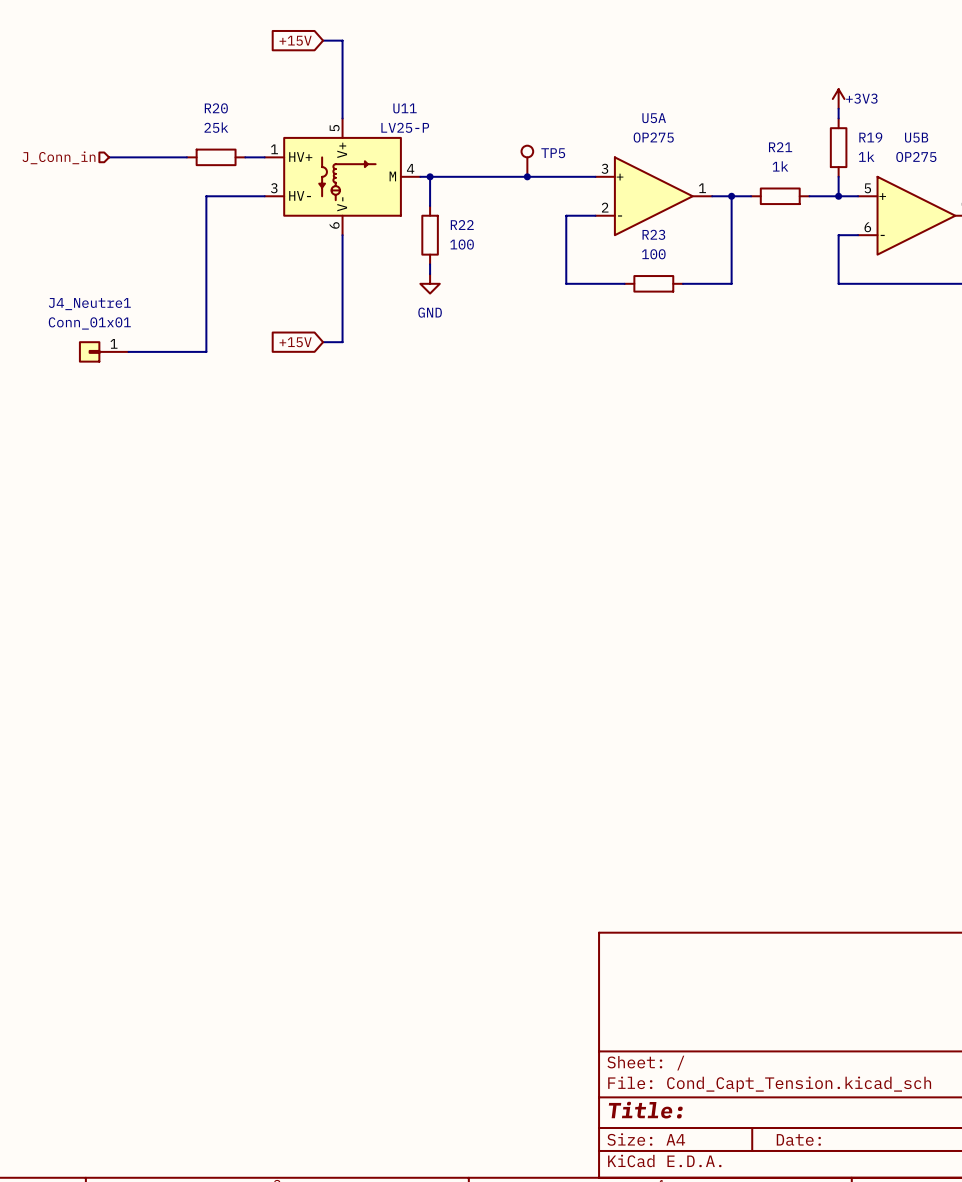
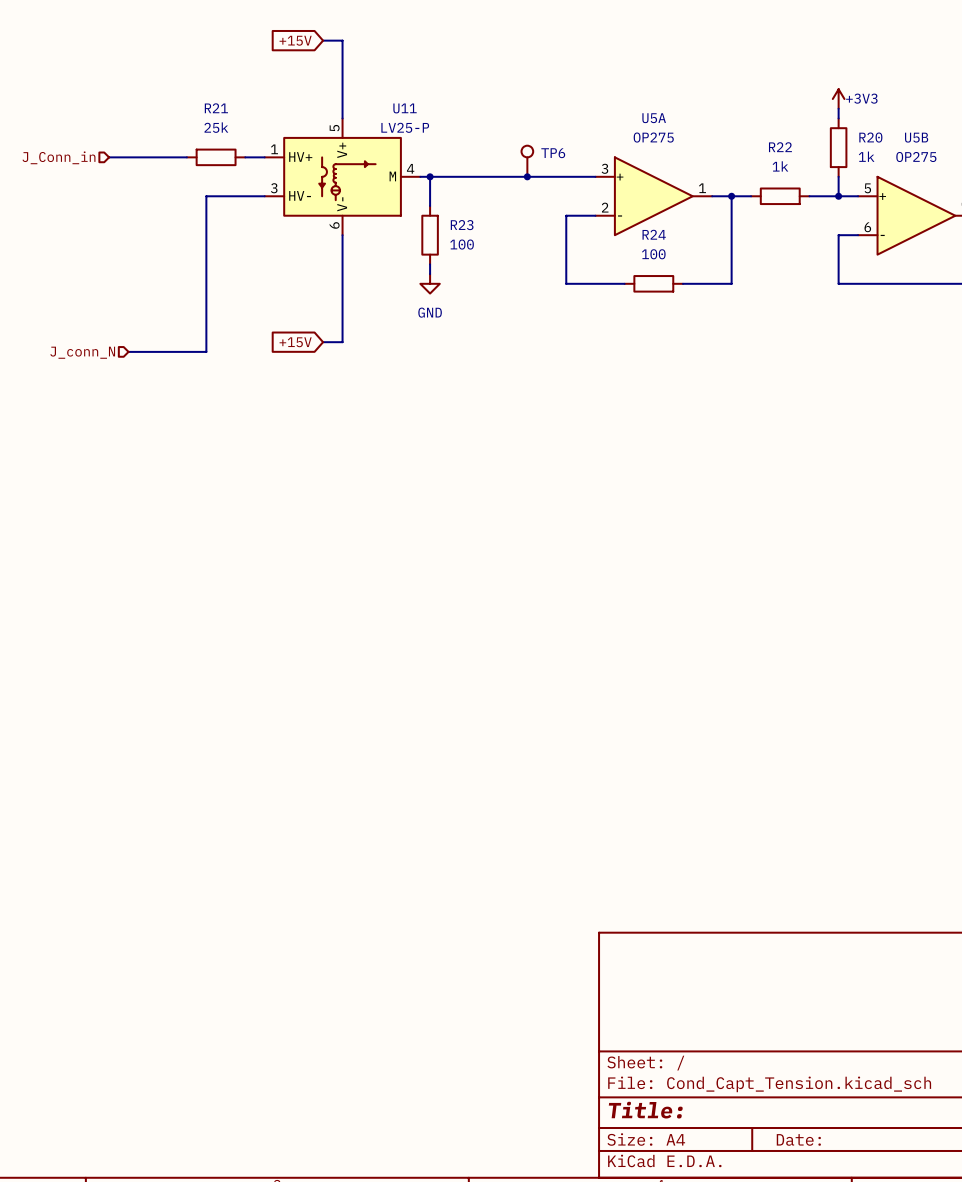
R20 name: R20 (216, 108) -> R21 (216, 108)
R19 name: R19 (870, 137) -> R20 (870, 137)
R21 name: R21 (780, 147) -> R22 (780, 147)
TP5 name: TP5 (553, 153) -> TP6 (553, 153)
R22 name: R22 (462, 225) -> R23 (462, 225)
R23 name: R23 (653, 234) -> R24 (654, 234)
J4_Neutre1: Conn_01x01 (103, 351) -> none
hierarchical label: none -> J_conn_N (82, 352)

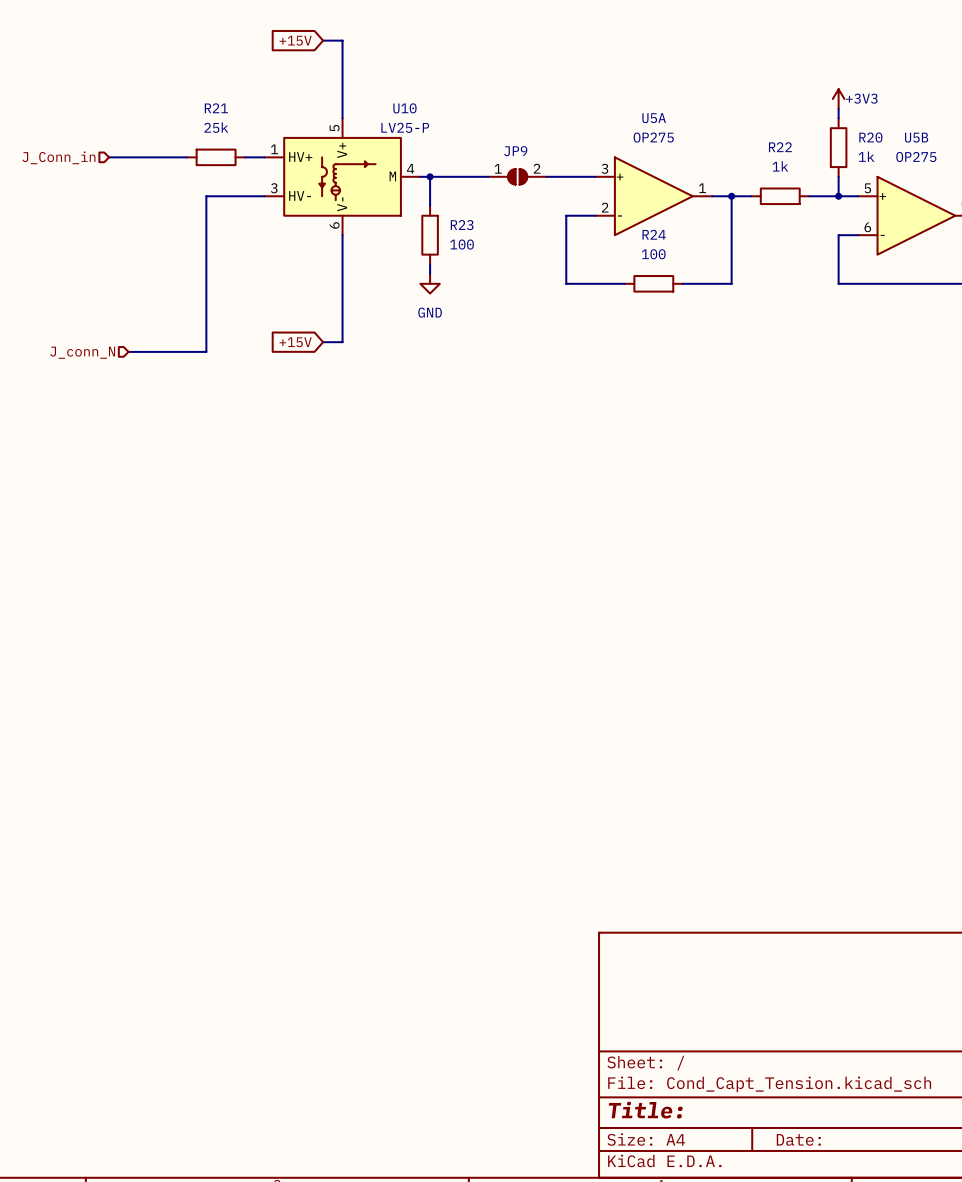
U11 name: U11 (405, 108) -> U10 (404, 108)
TP6: (527, 161) -> none
JP9: none -> (517, 176)
junction: (527, 176) -> none

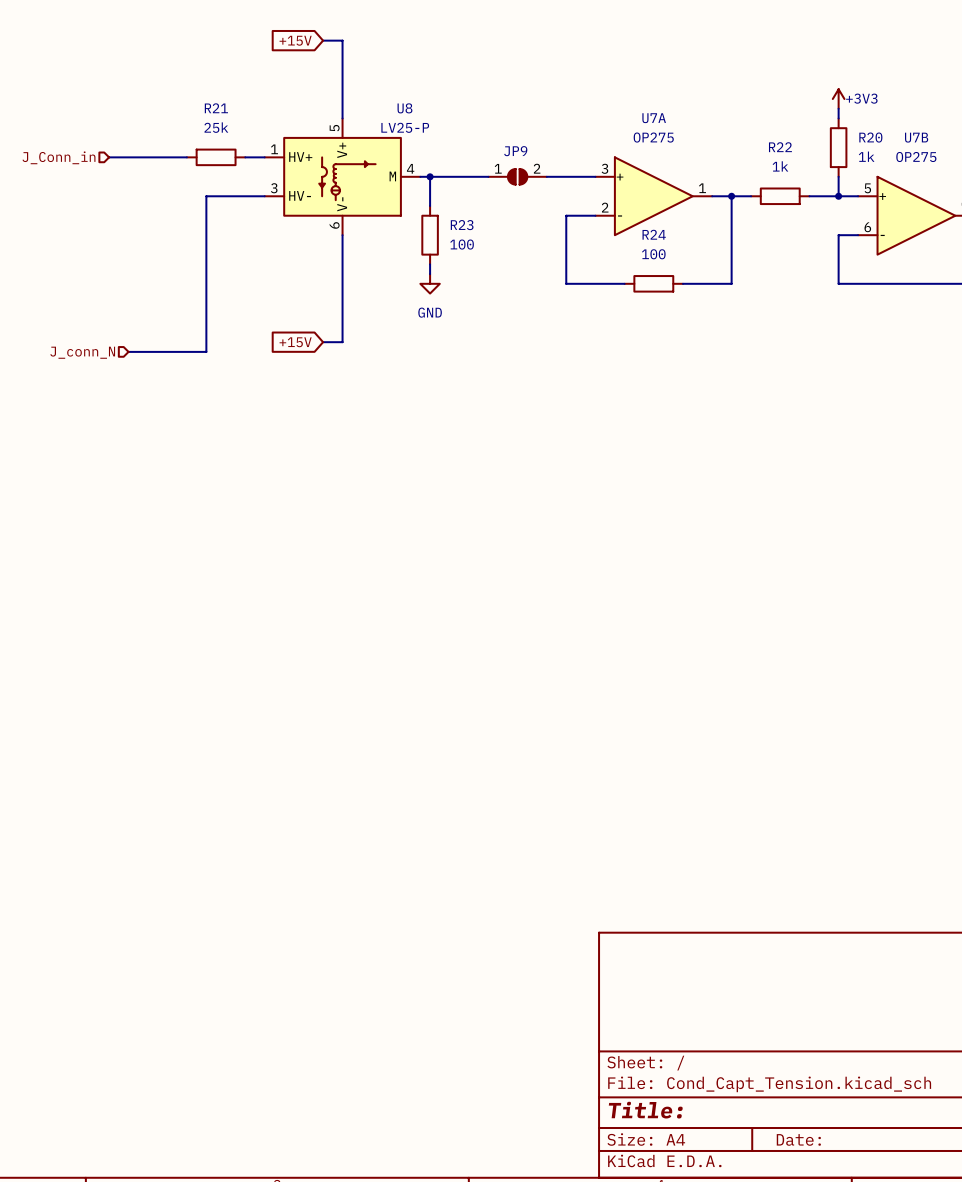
U10 name: U10 (404, 108) -> U8 (404, 108)
U5A name: U5A (654, 118) -> U7A (654, 118)
U5B name: U5B (916, 137) -> U7B (916, 137)

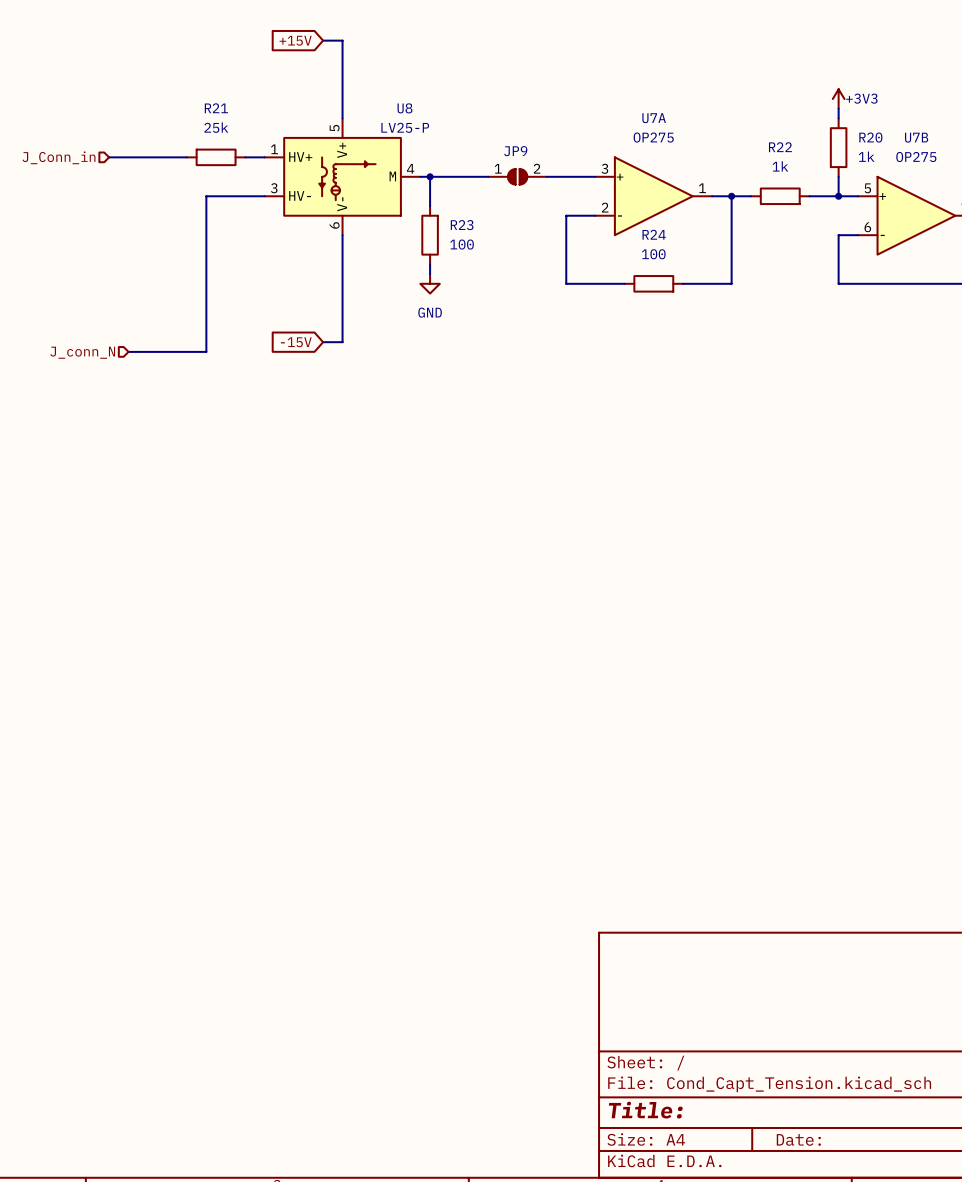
global label: +15V (295, 342) -> -15V (296, 342)

